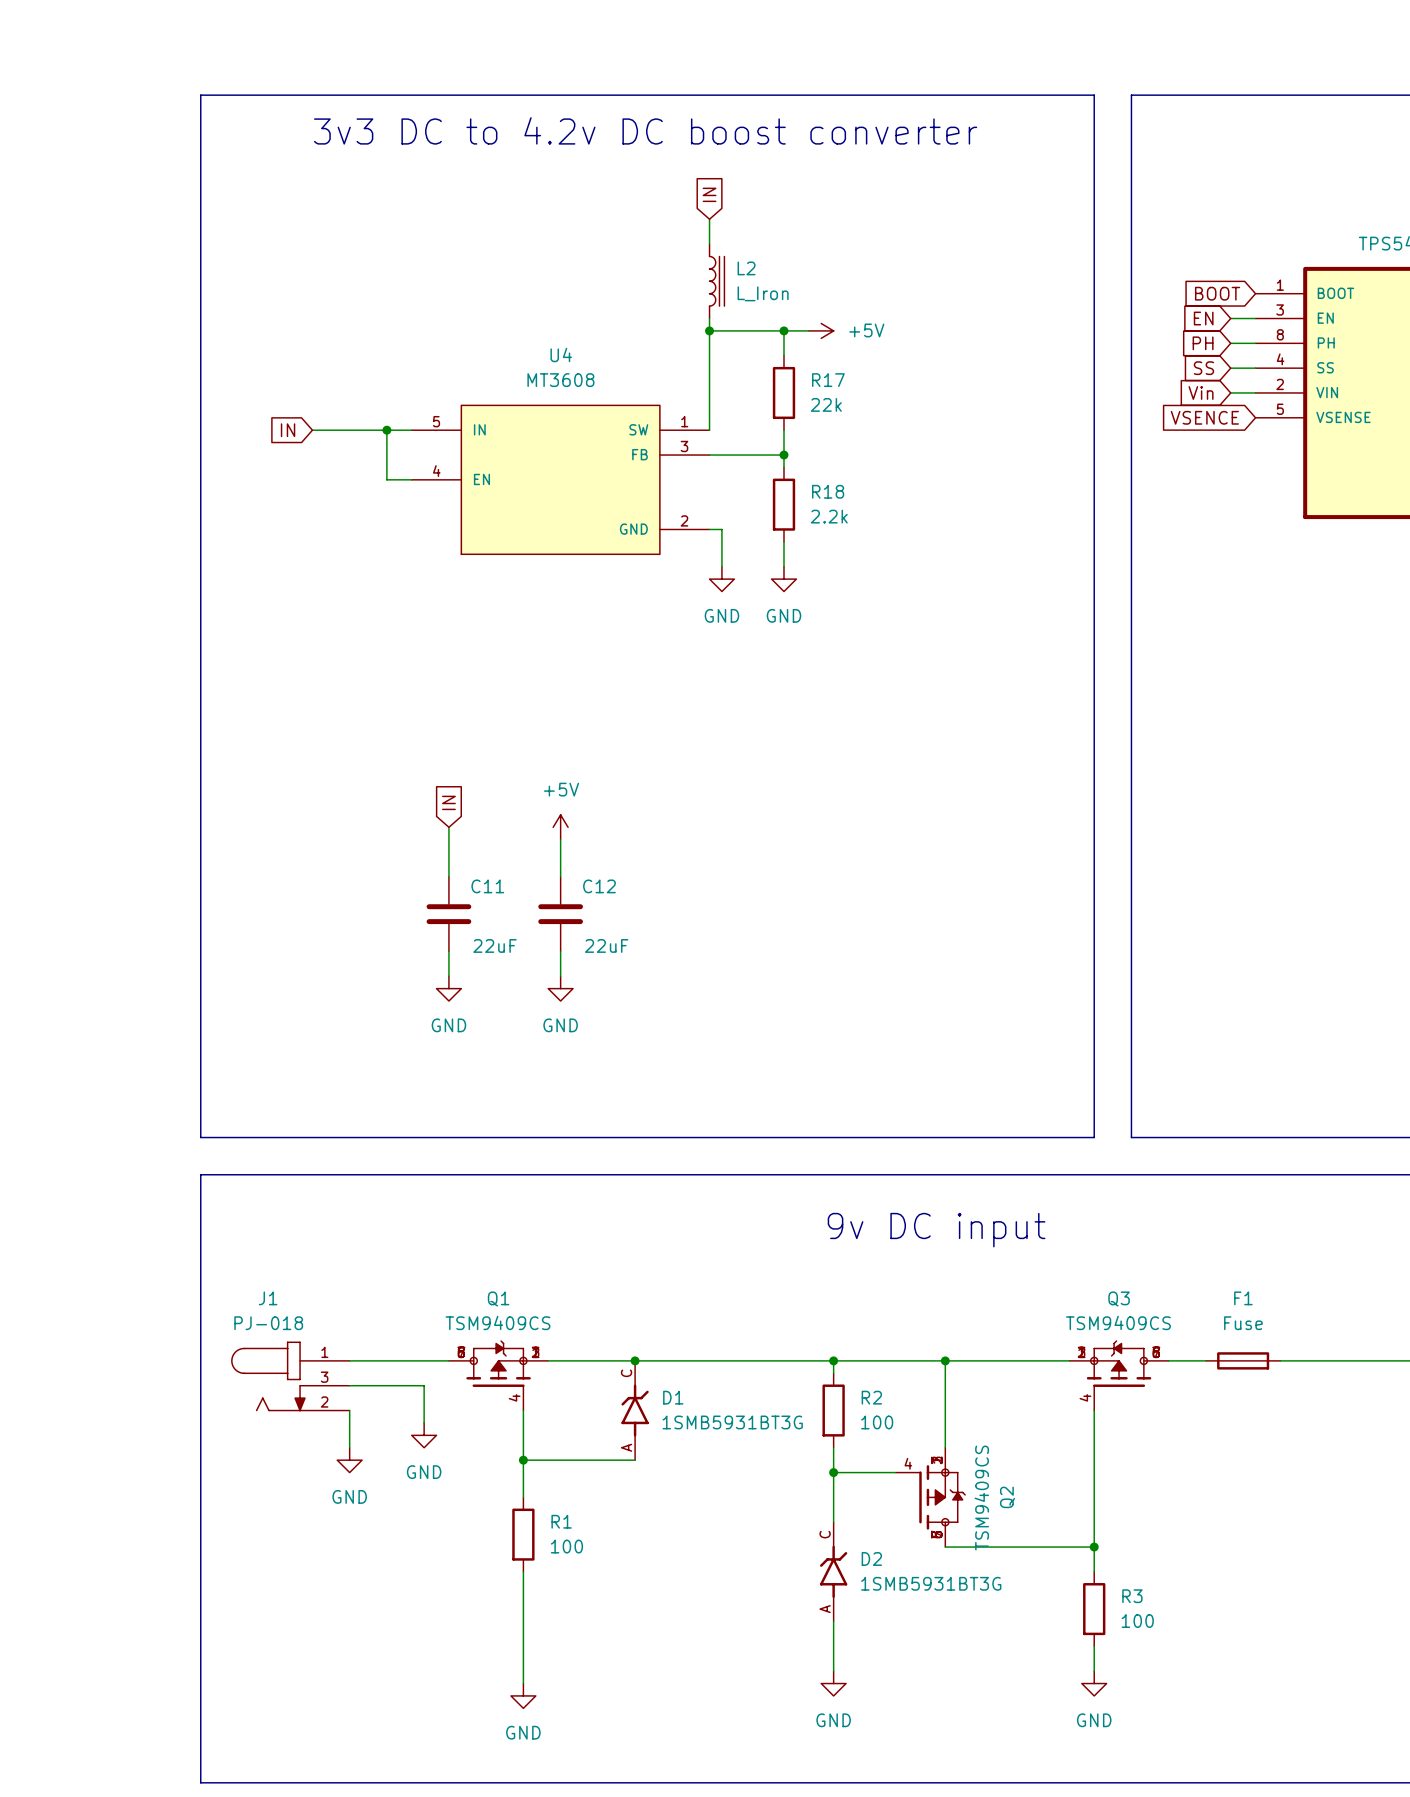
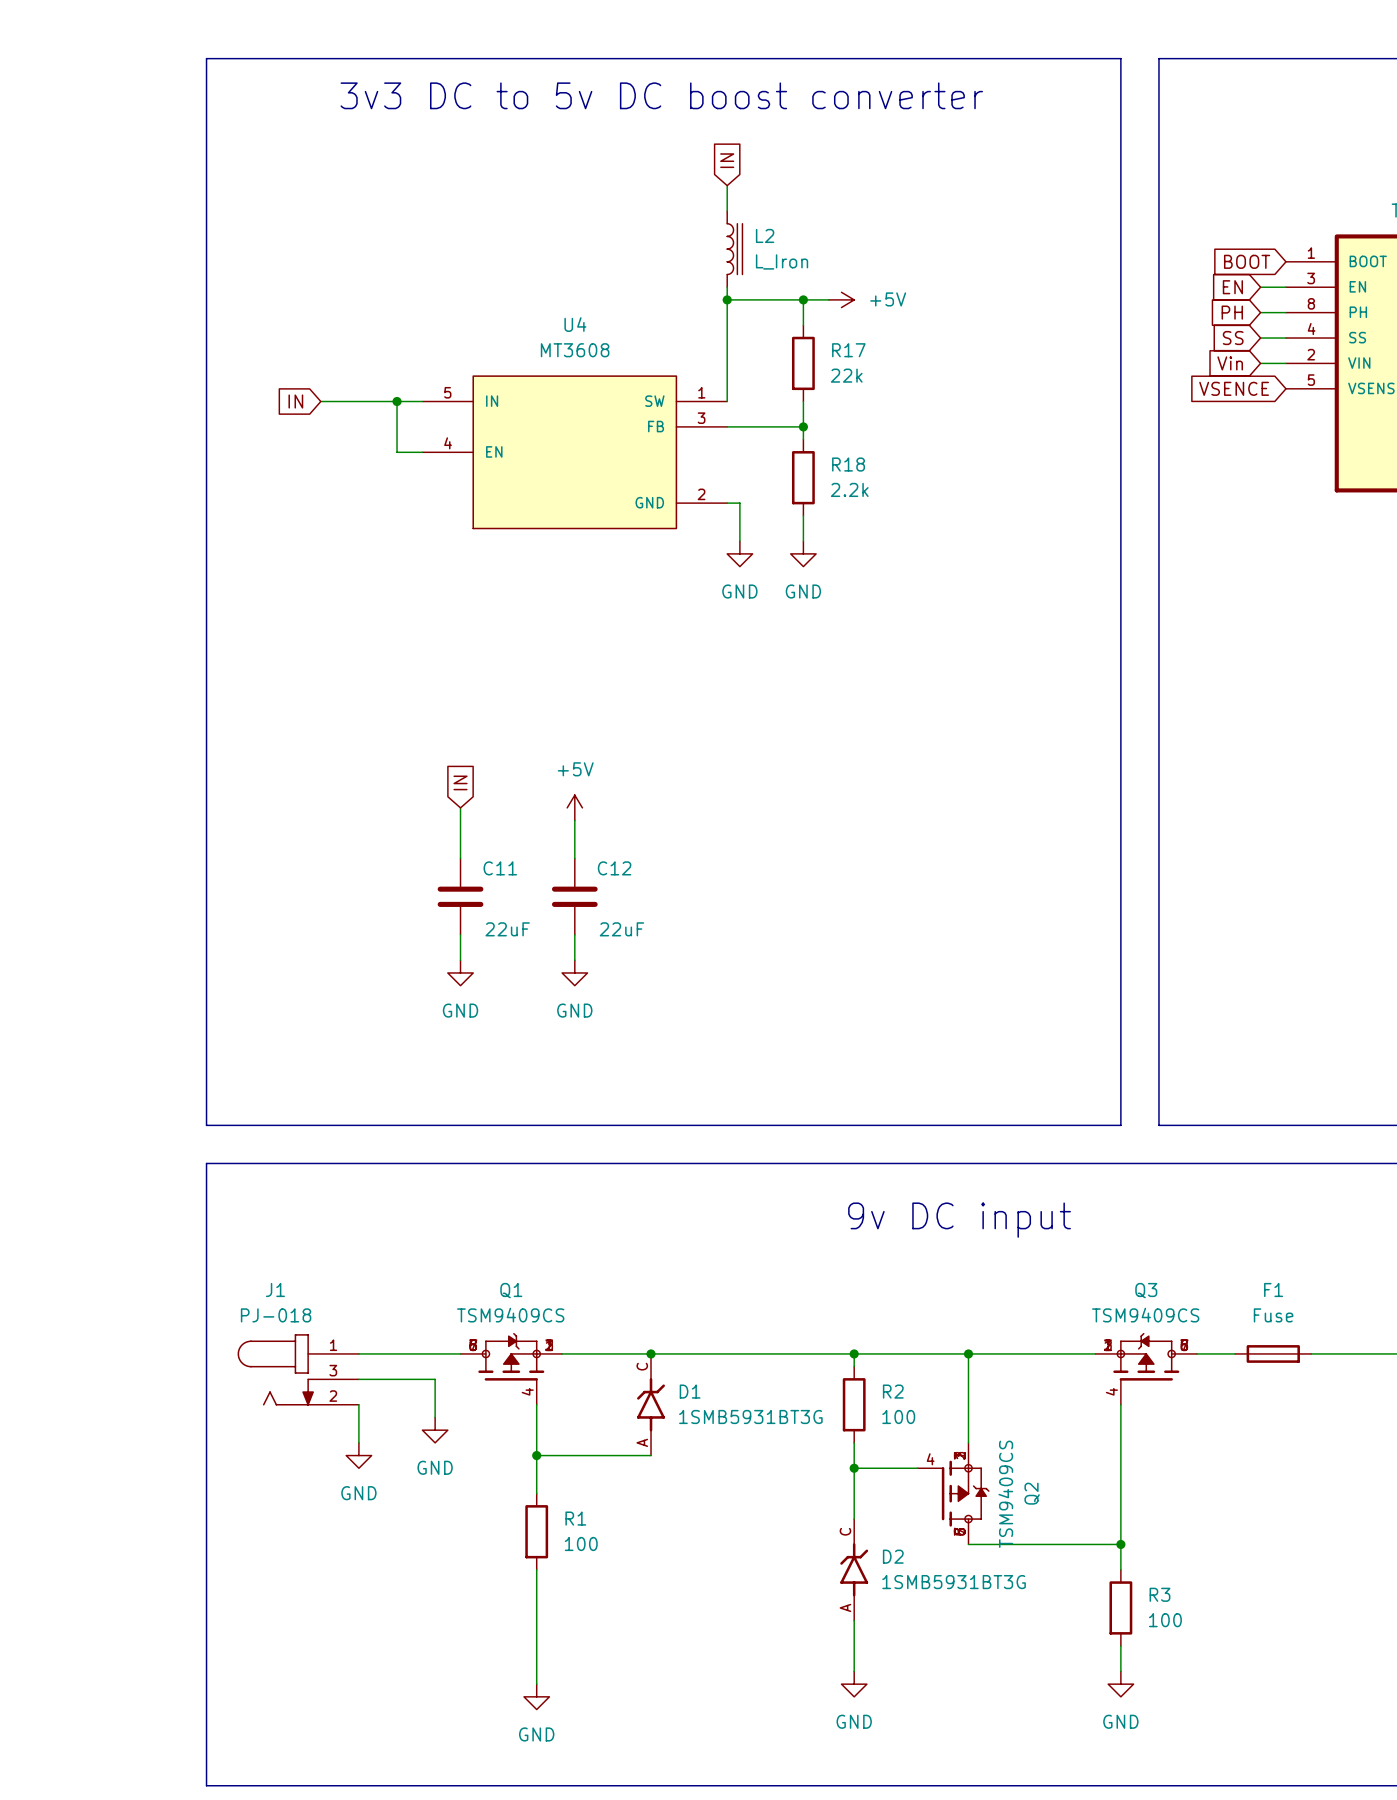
text: 3v3 DC to 4.2v DC boost converter (645, 130) -> 3v3 DC to 5v DC boost converter (661, 95)

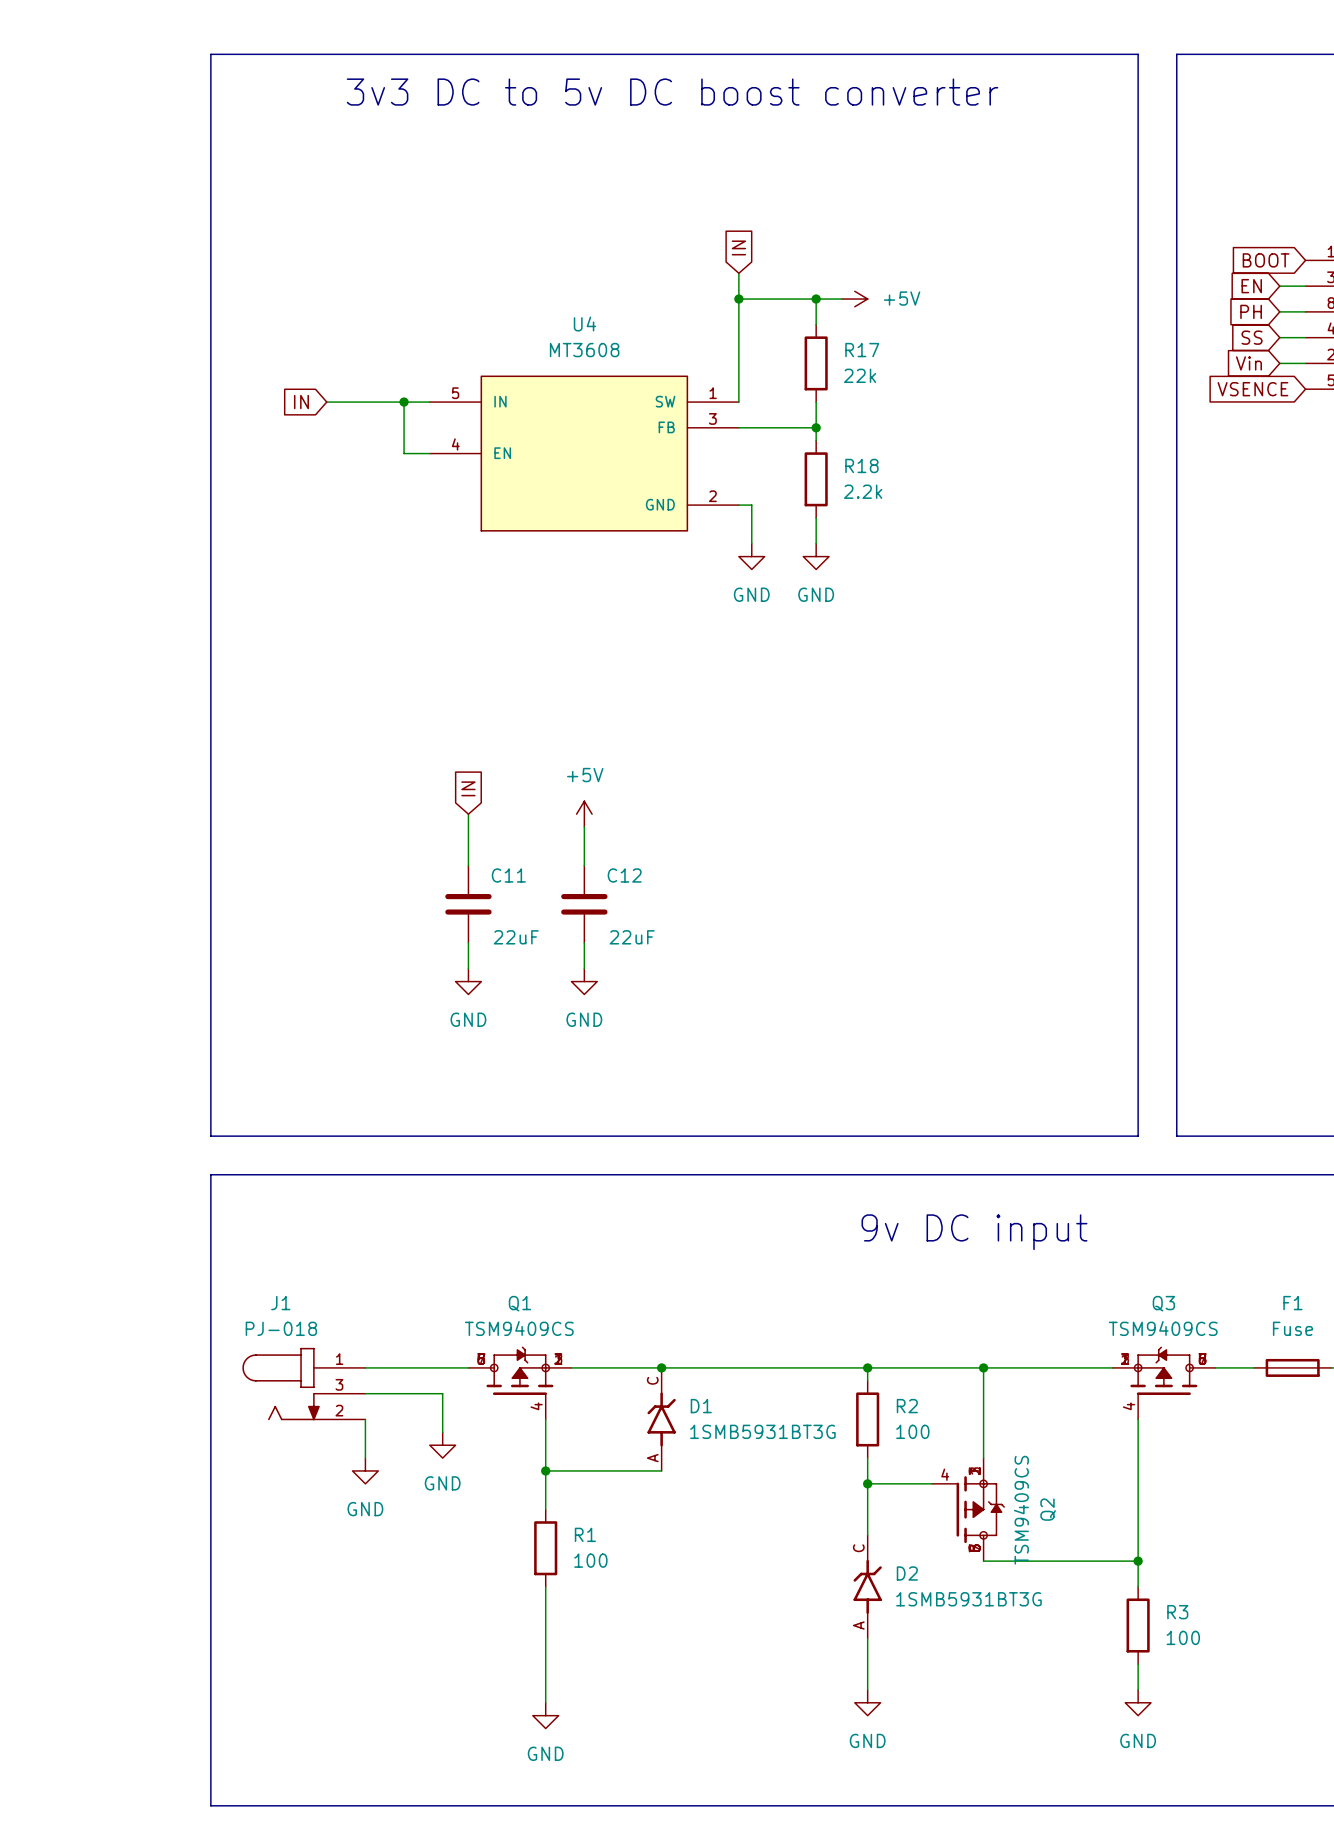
global label position: IN (727, 160) -> IN (738, 247)
wire: (727, 185) (727, 211) -> none
L2: L_Iron (734, 249) -> none

